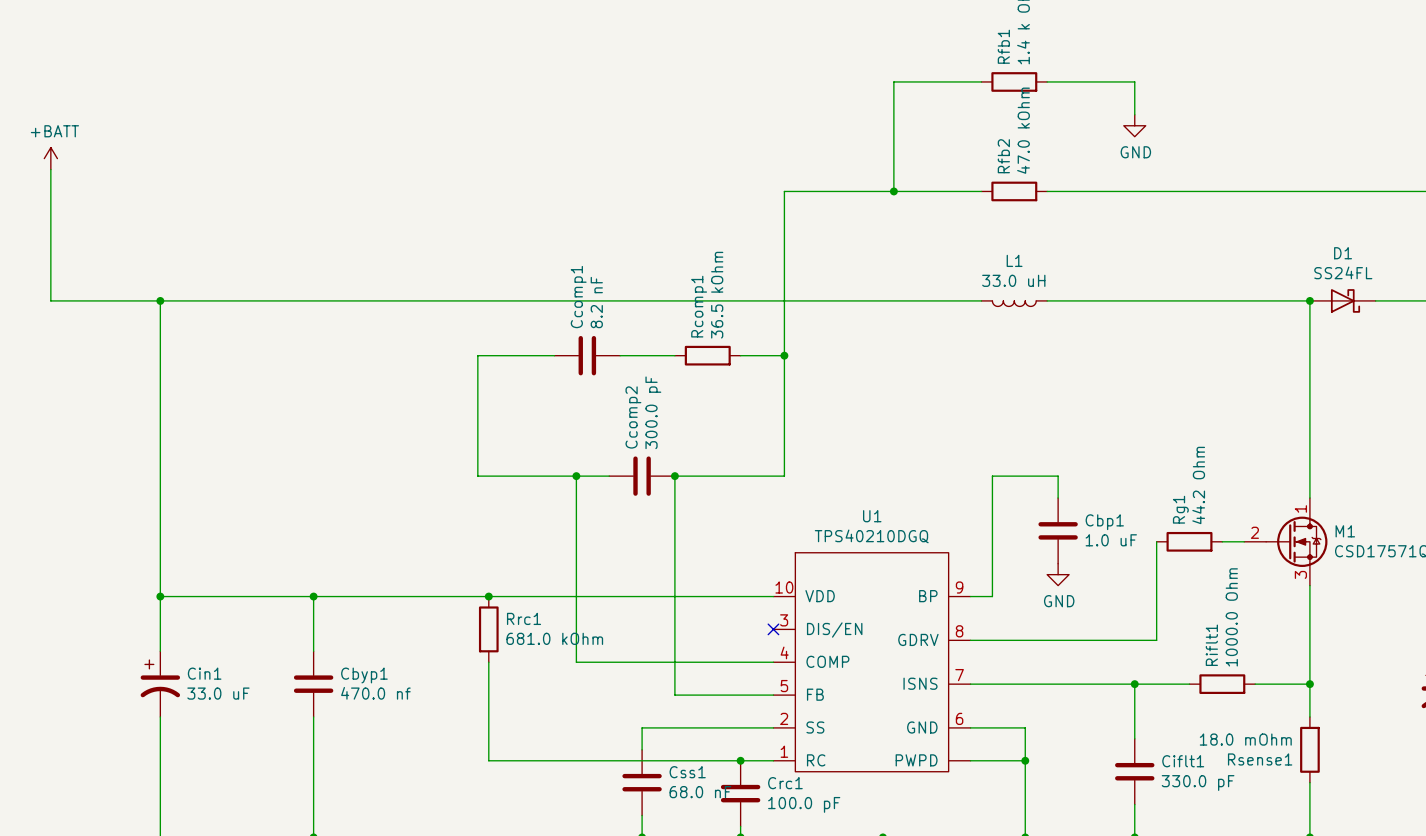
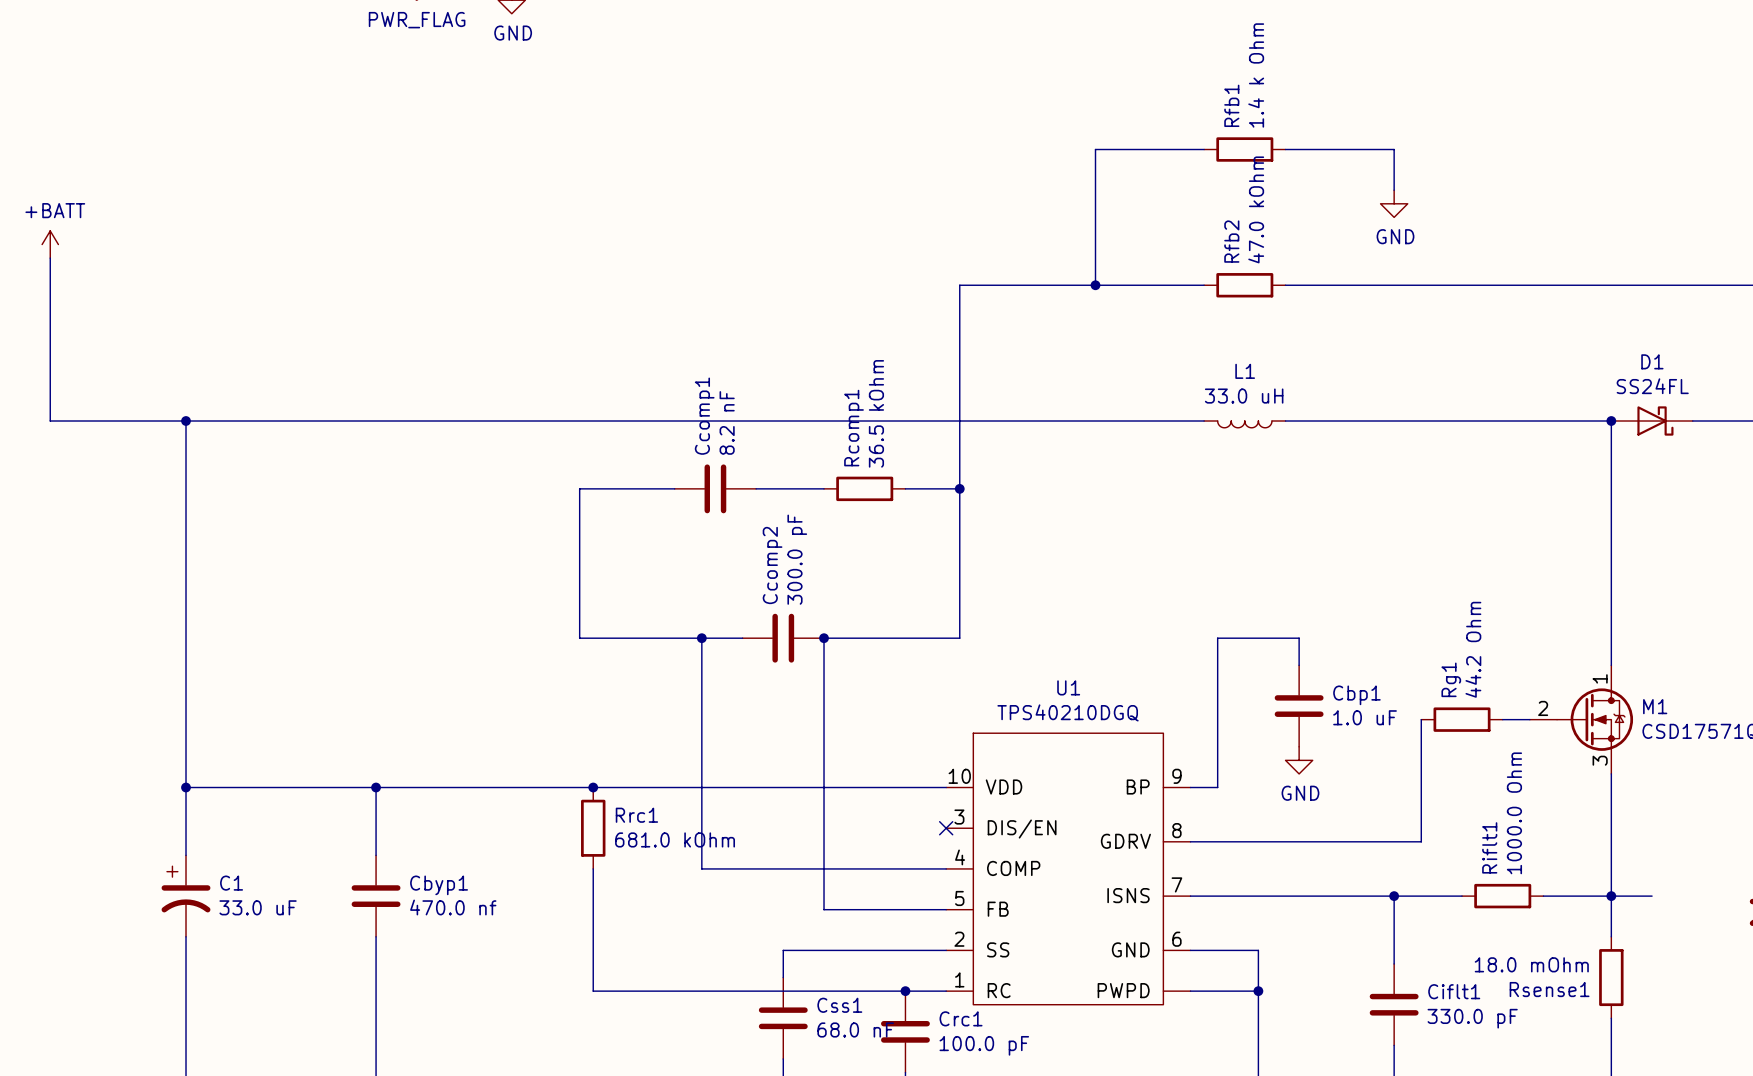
Cin1 name: Cin1 (204, 673) -> C1 (231, 883)
wire: none -> (1611, 896) (1652, 896)

